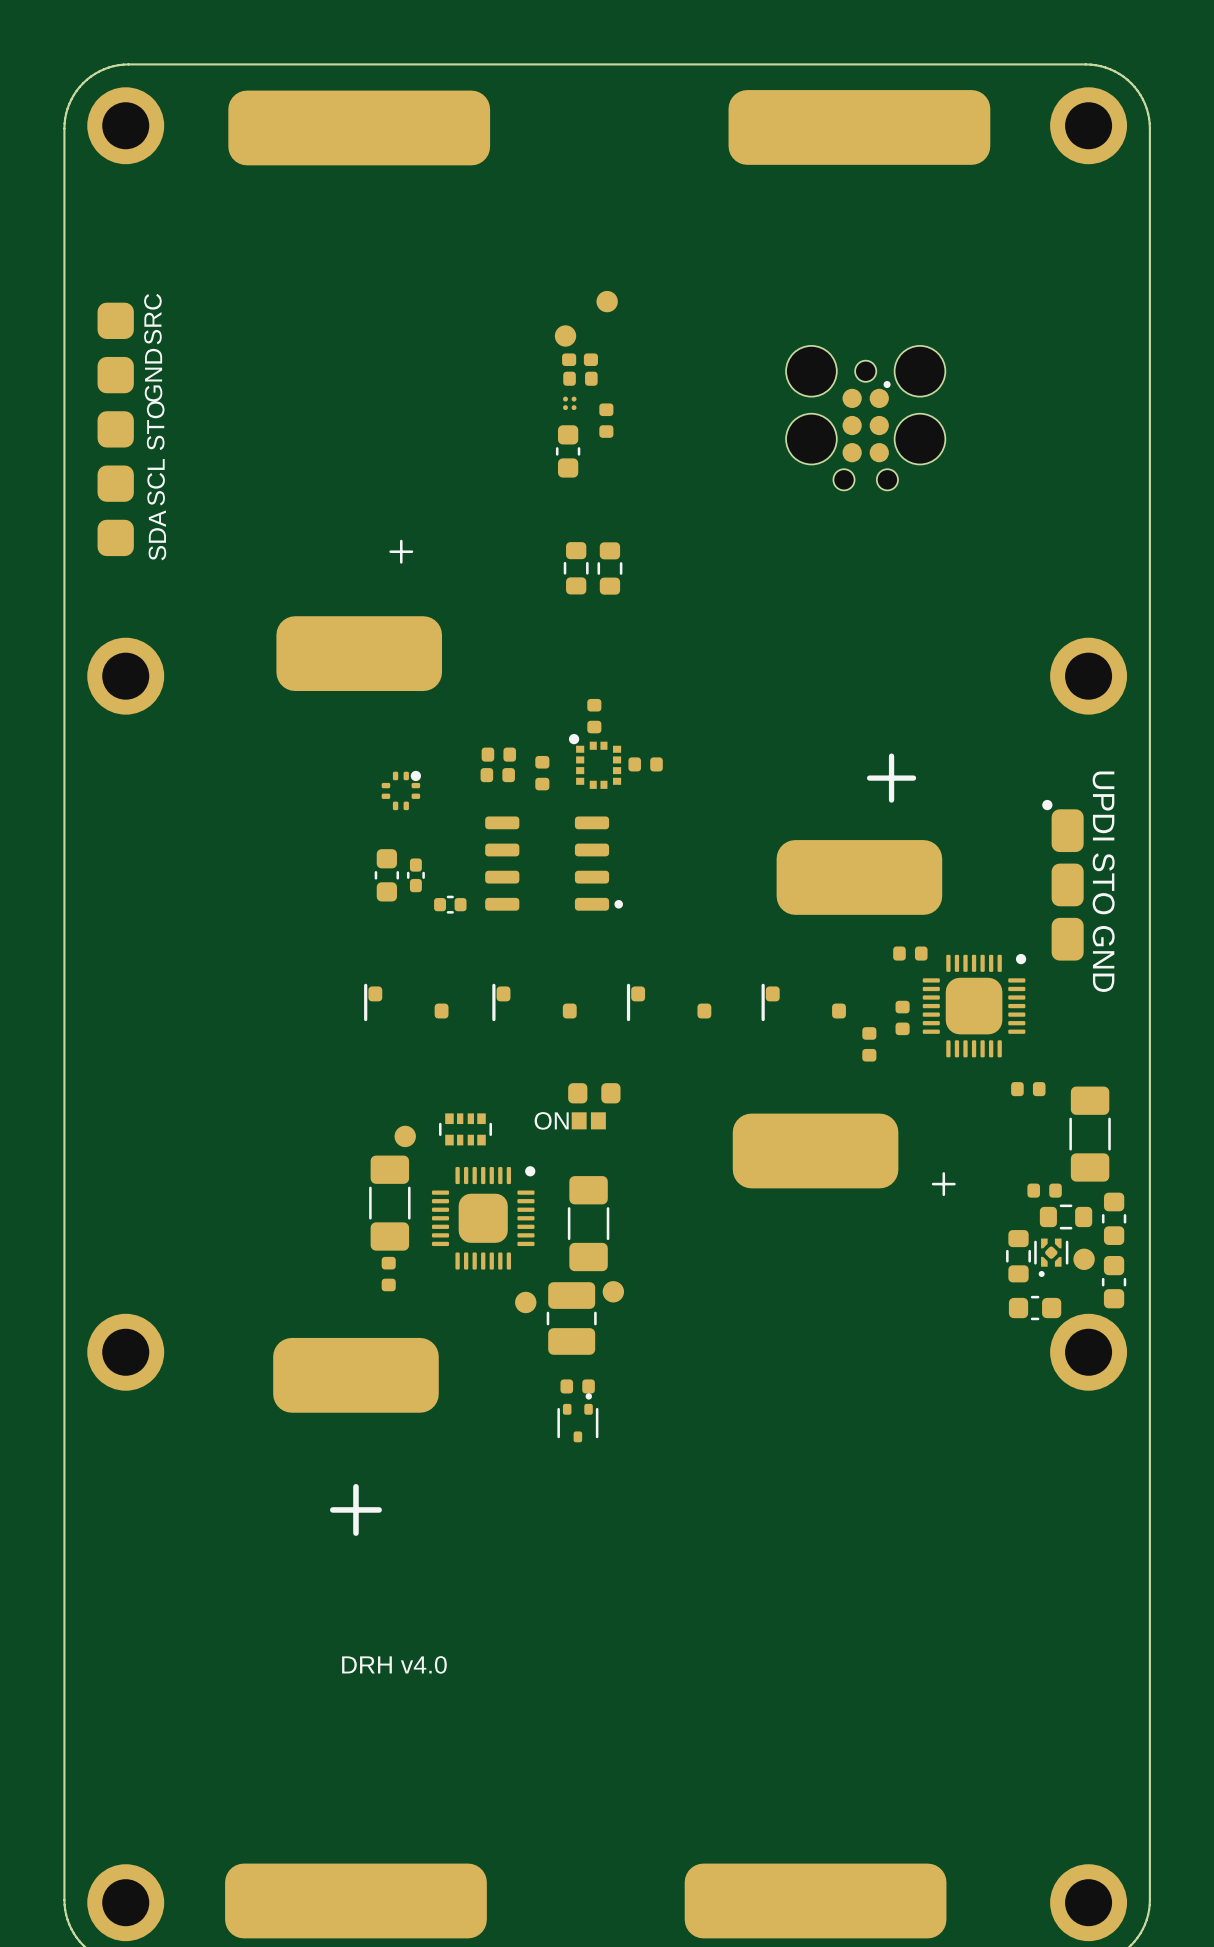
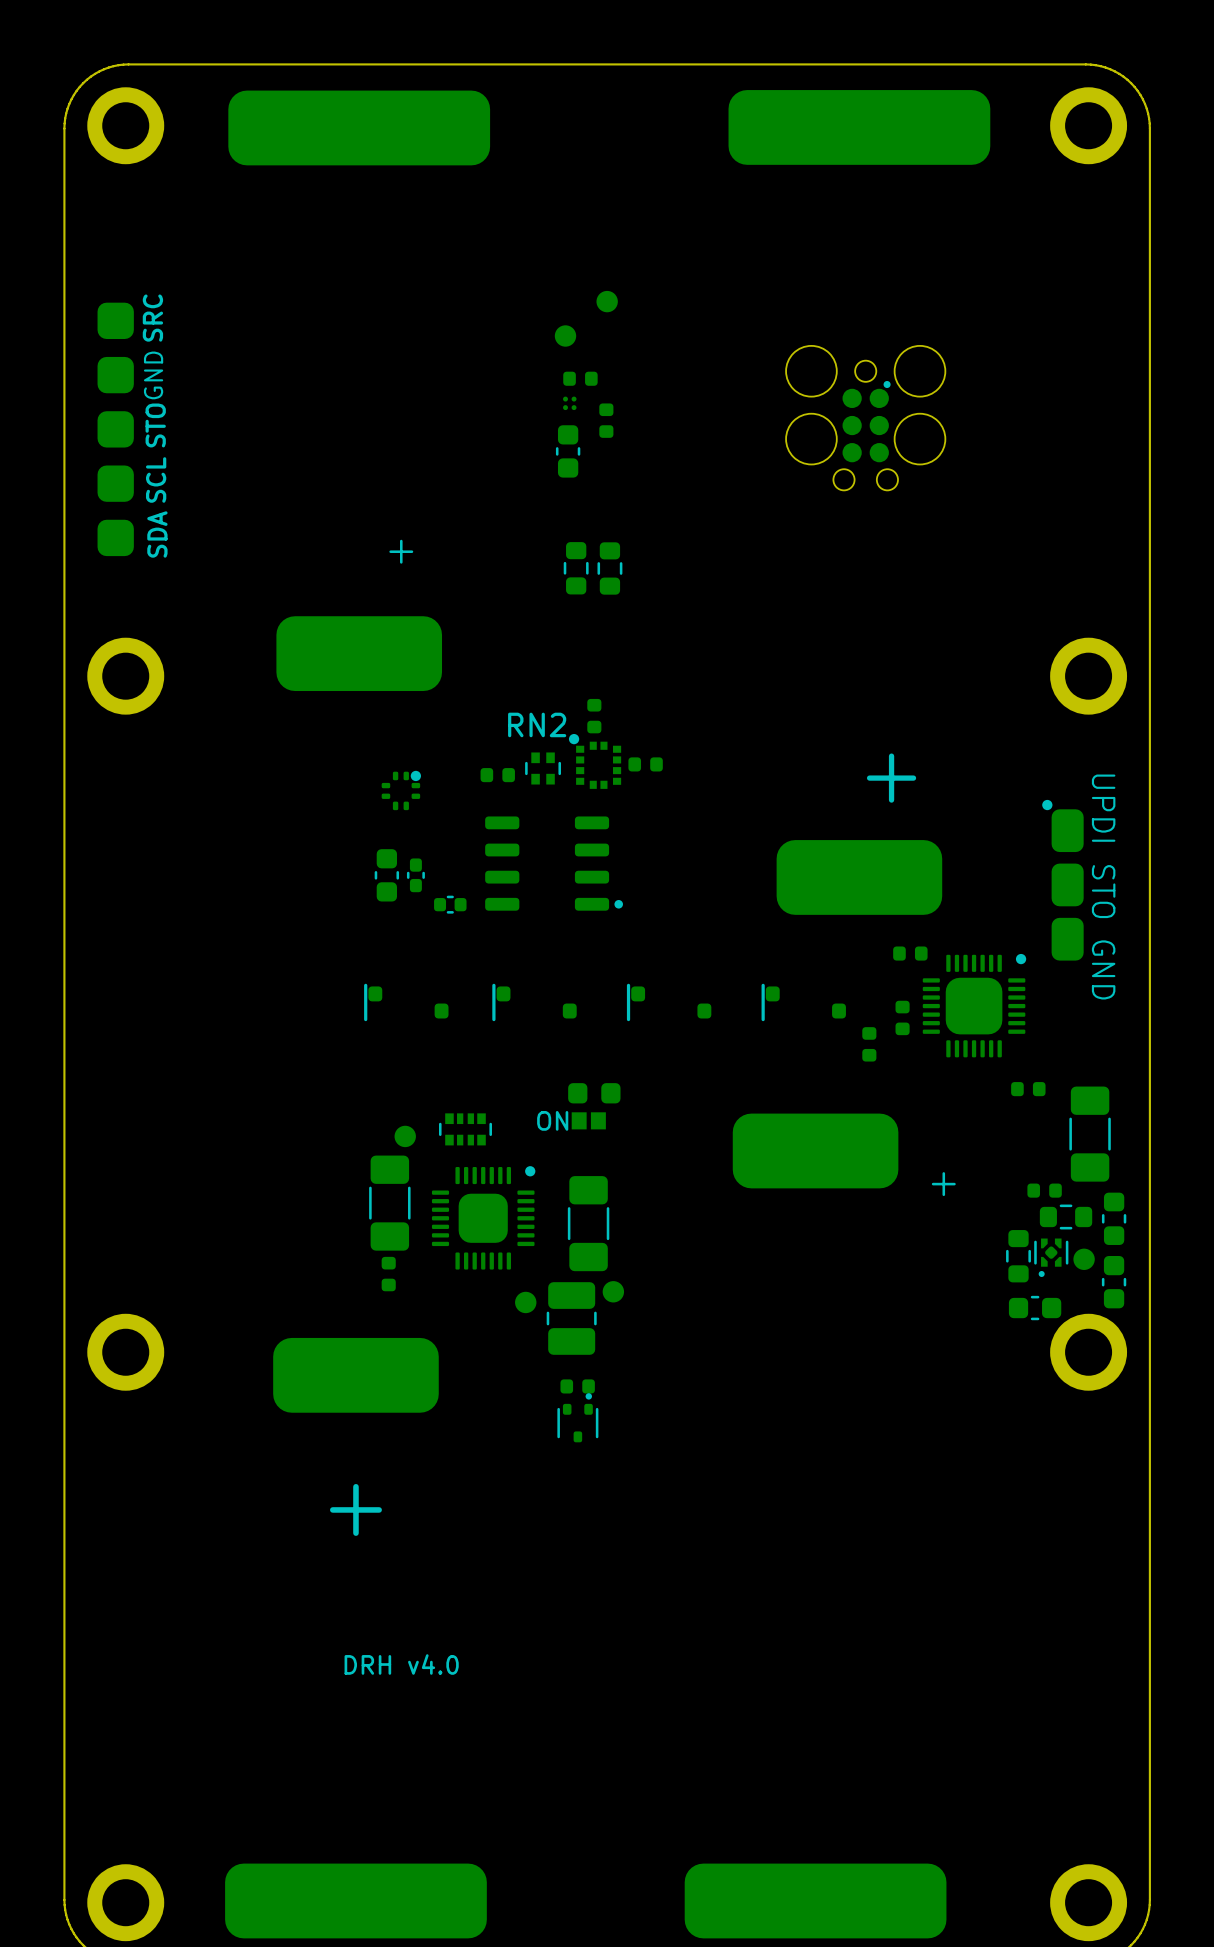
part: (580, 359) -> none
part: (498, 754) -> none
RN2: none -> (543, 768)
part: (542, 773) -> none

